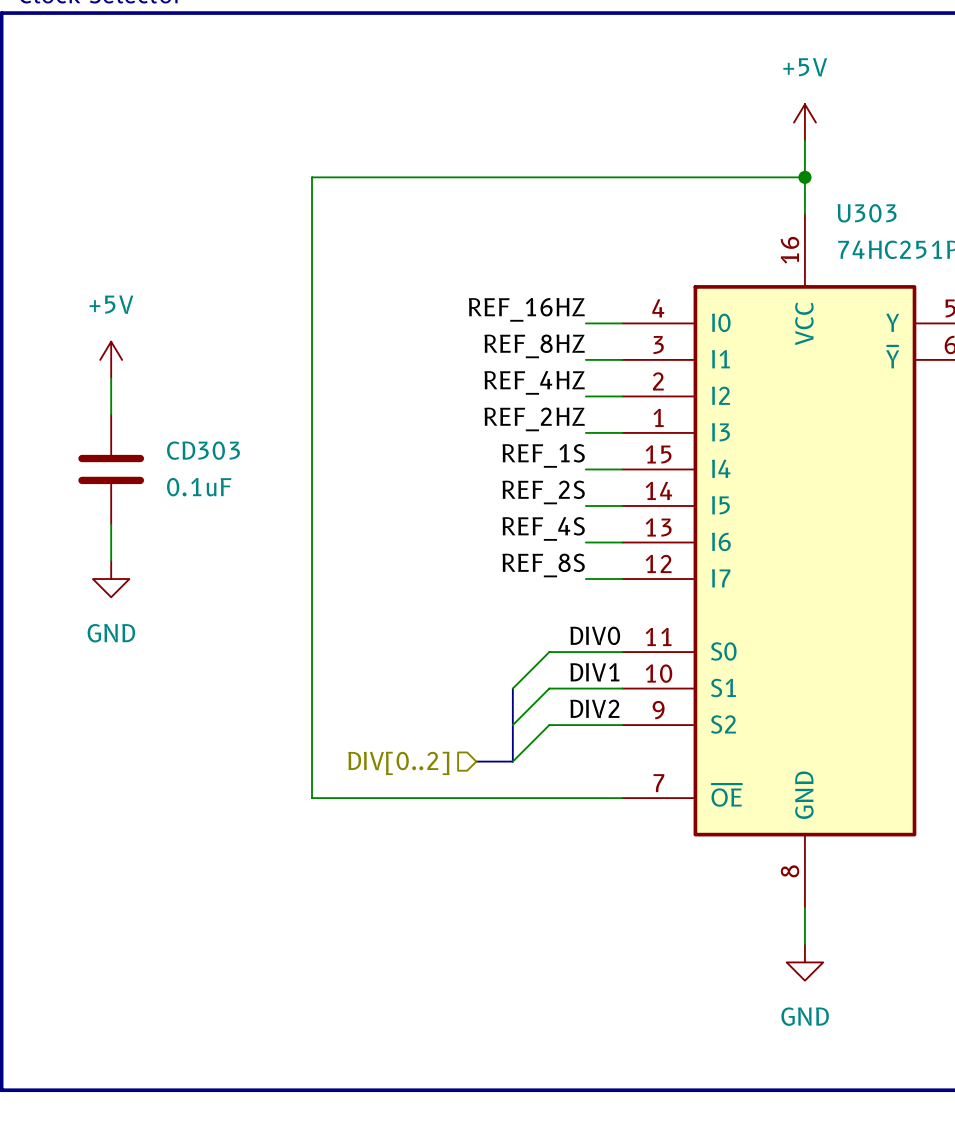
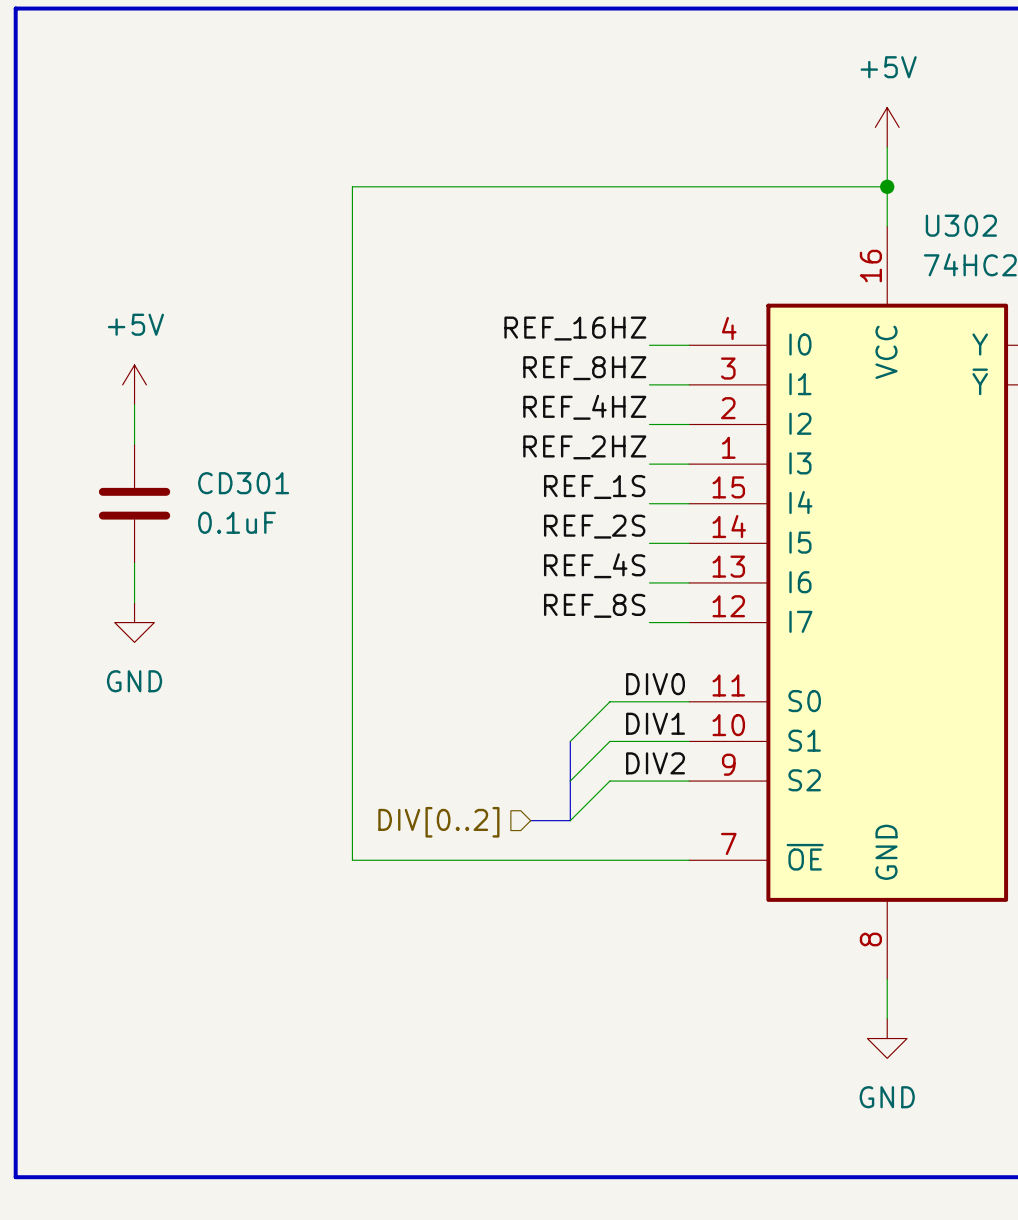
U303 name: U303 (867, 213) -> U302 (961, 225)
CD303 name: CD303 (203, 450) -> CD301 (243, 483)

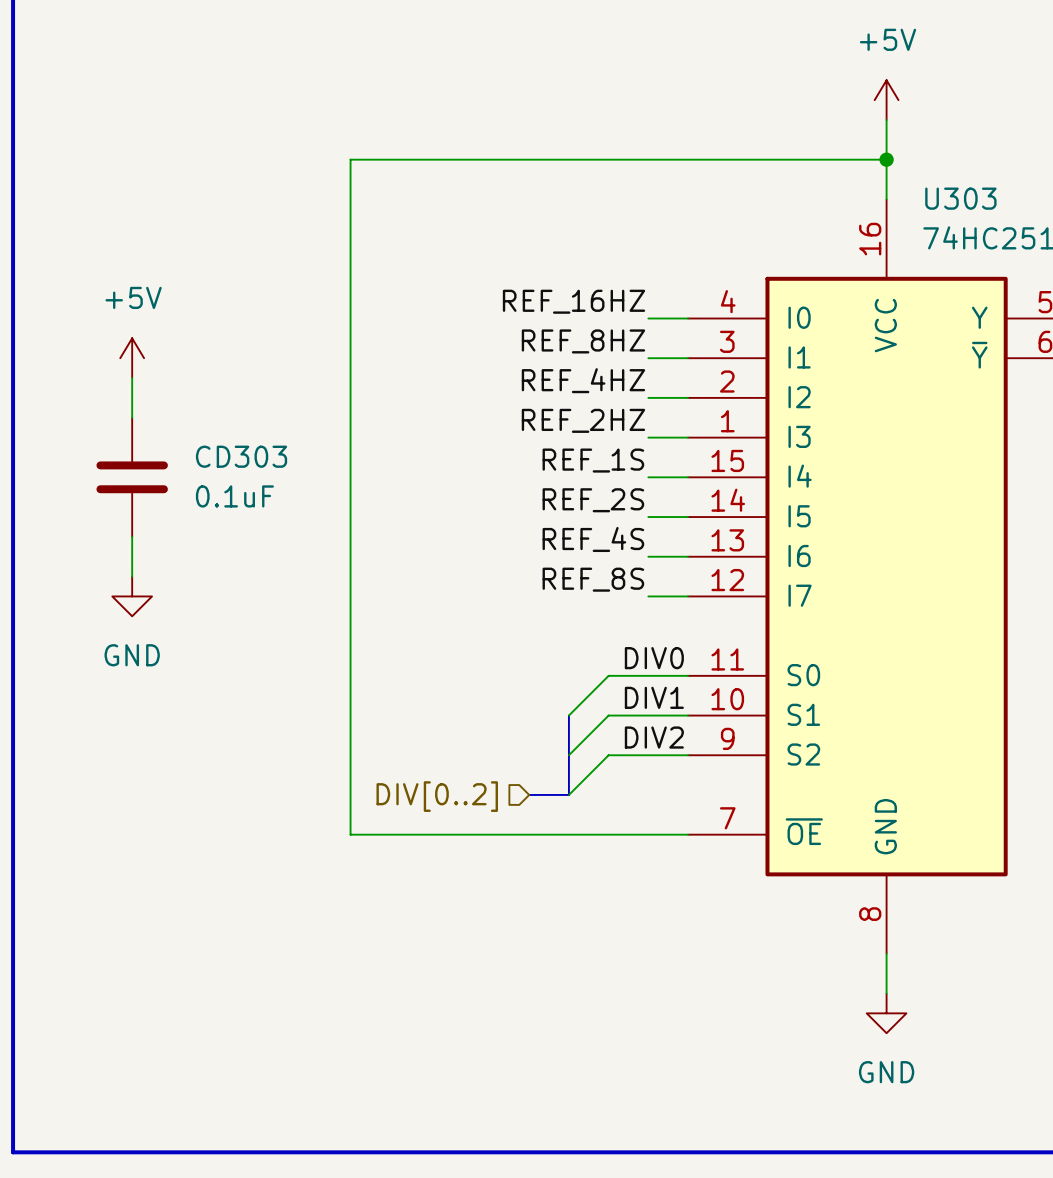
U302 name: U302 (961, 225) -> U303 (960, 198)
CD301 name: CD301 (243, 483) -> CD303 (241, 456)

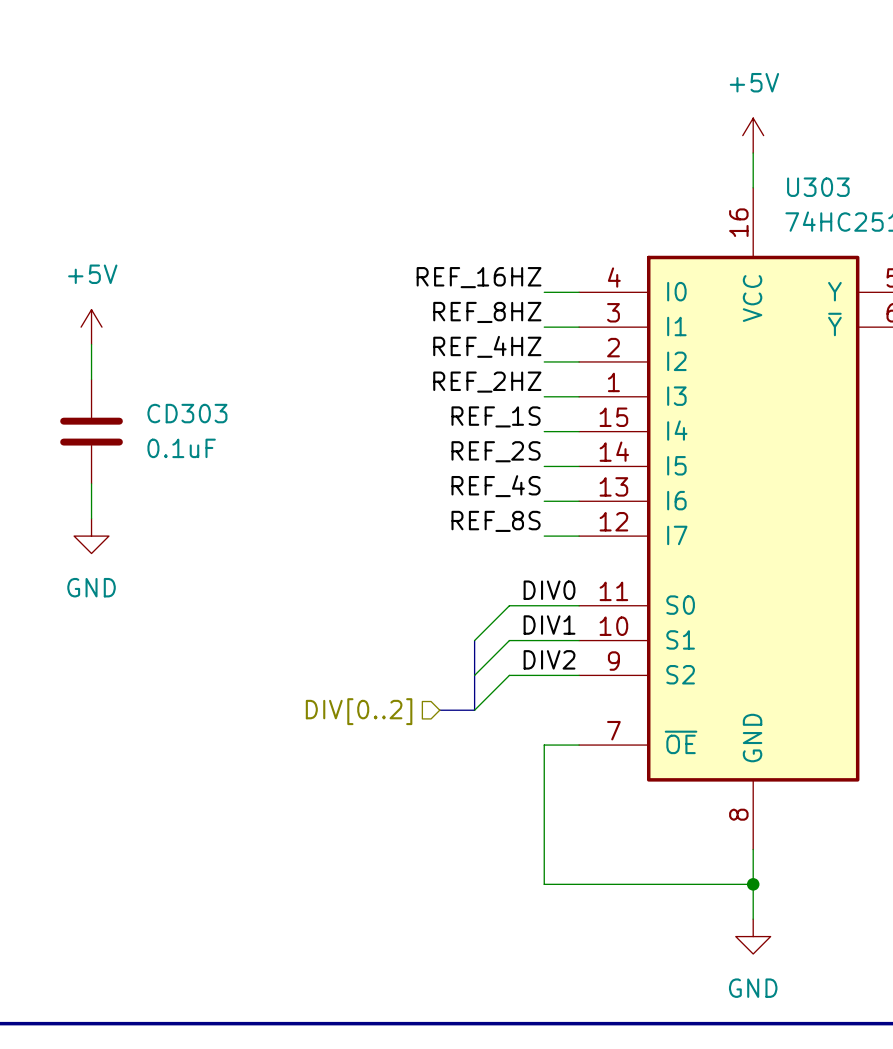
power symbol position: +5V (886, 100) -> +5V (753, 135)
wire: (886, 119) (886, 159) (350, 159) (350, 834) (648, 834) -> (753, 919) (753, 884) (544, 884) (544, 745)
junction: (886, 159) -> none
junction: none -> (753, 884)
power symbol position: GND (886, 1013) -> GND (753, 936)

